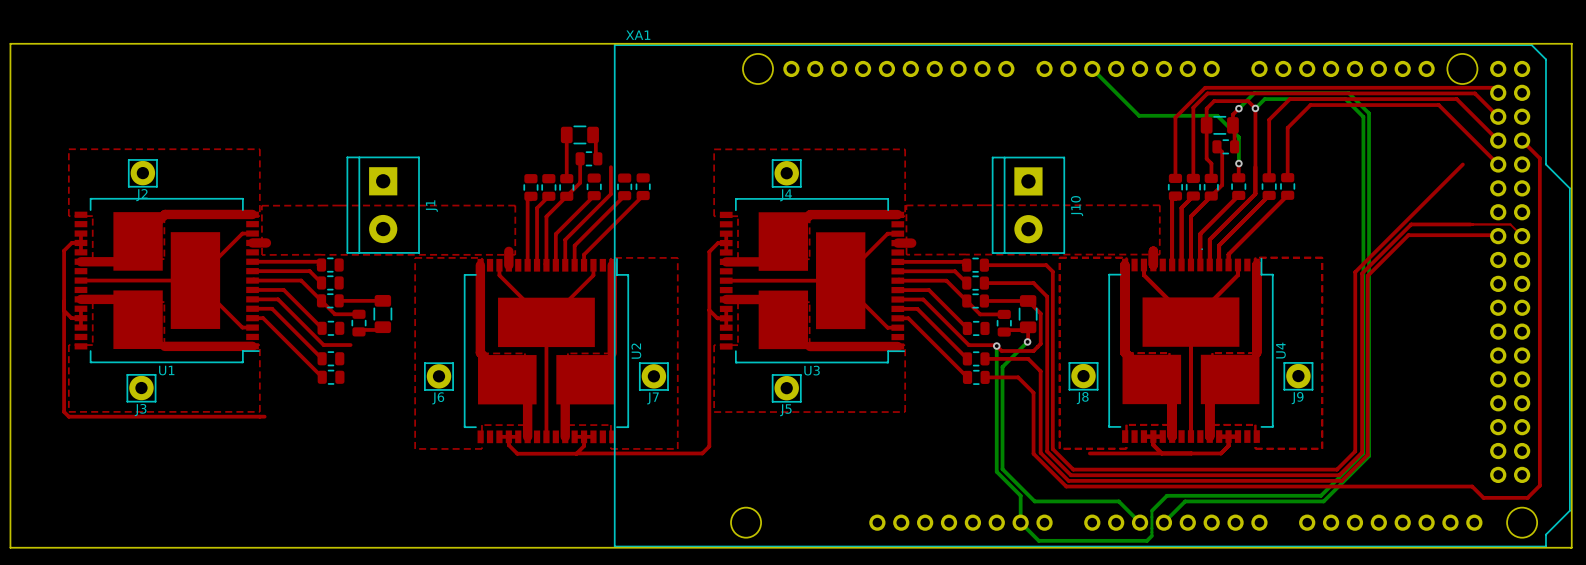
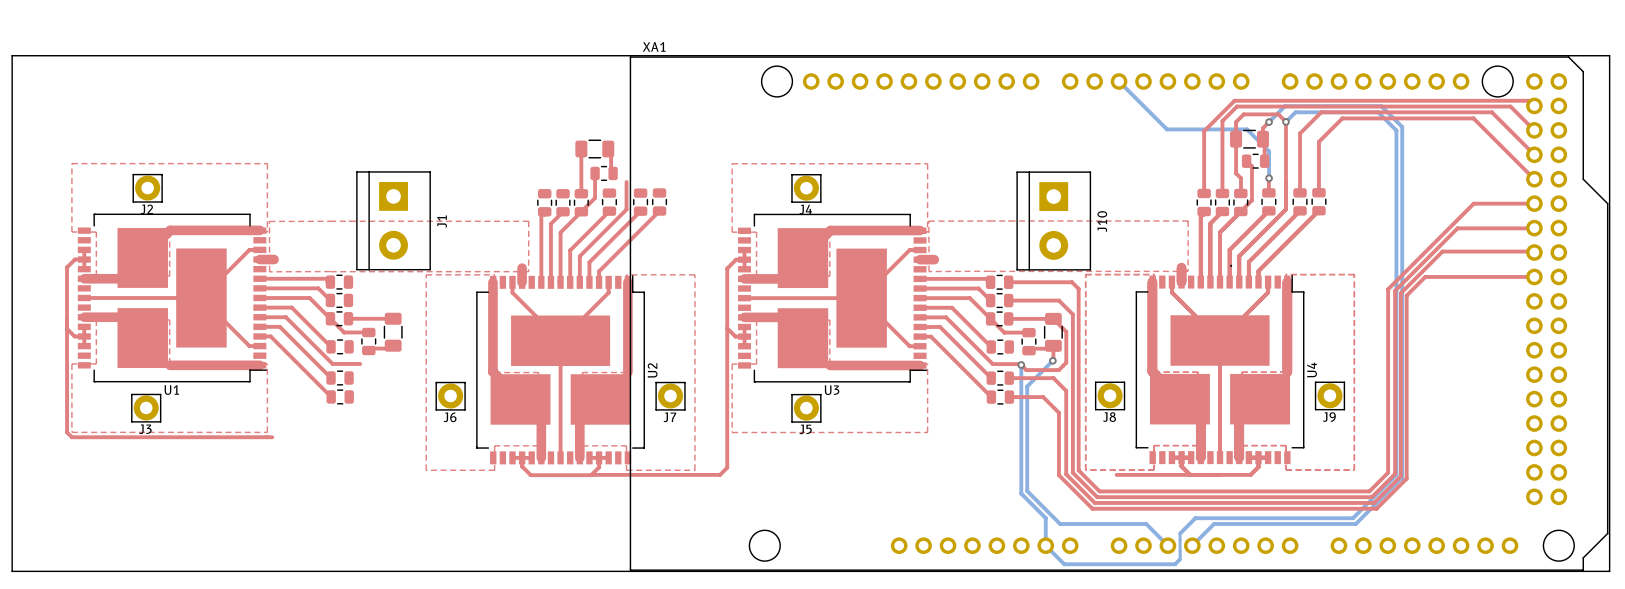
top track: (1522, 140) (1539, 158) (1539, 485) (1527, 497) (1483, 497) (1472, 486) (1344, 486) -> (1534, 276) (1425, 276) (1406, 295) (1406, 478) (1376, 508)
top track: (1462, 164) (1438, 188) -> (1534, 203) (1473, 203)
top track: (1411, 224) (1510, 224) (1522, 236) -> (1445, 240) (1457, 228) (1534, 228)

